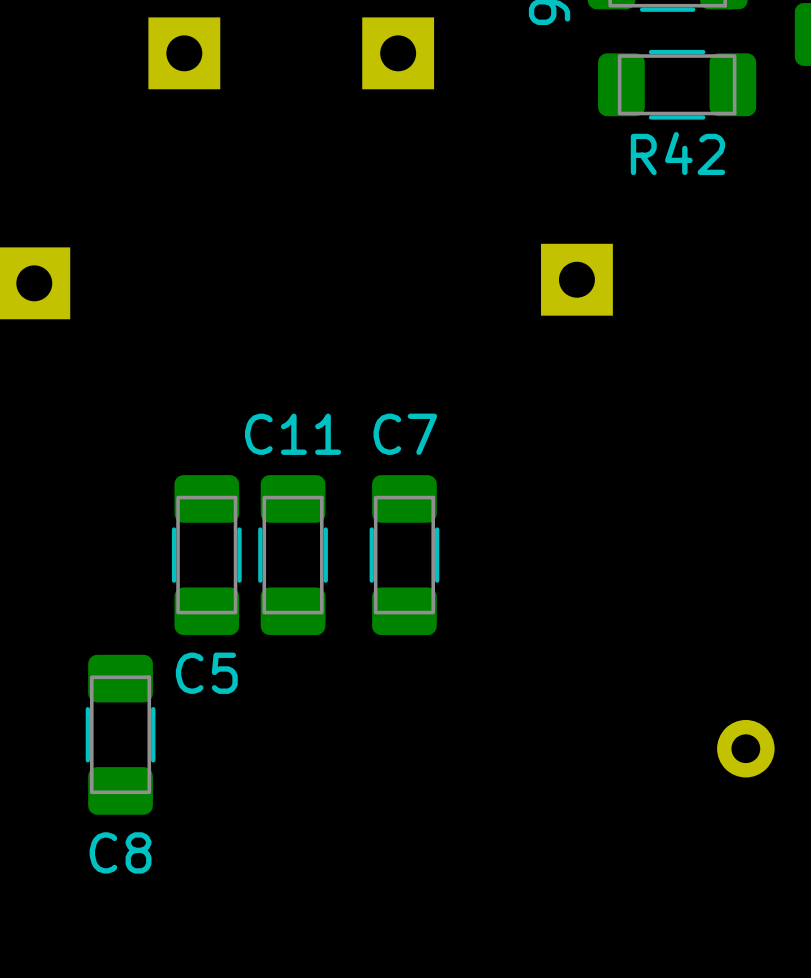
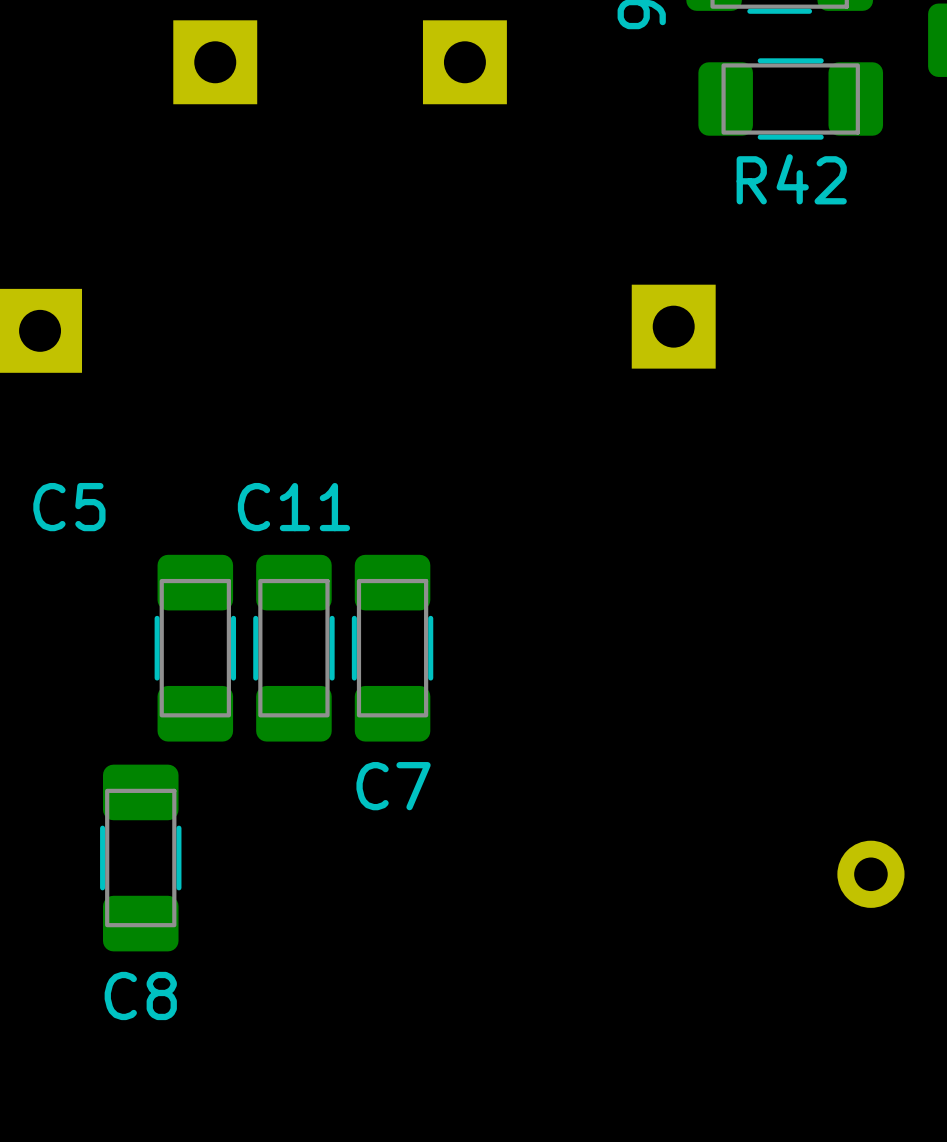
C7 name position: C7 (405, 434) -> C7 (393, 786)
C5 position: (206, 555) -> (195, 648)
C11 position: (293, 555) -> (293, 648)
C7 position: (404, 555) -> (392, 648)
C5 name position: C5 (206, 673) -> C5 (69, 507)

